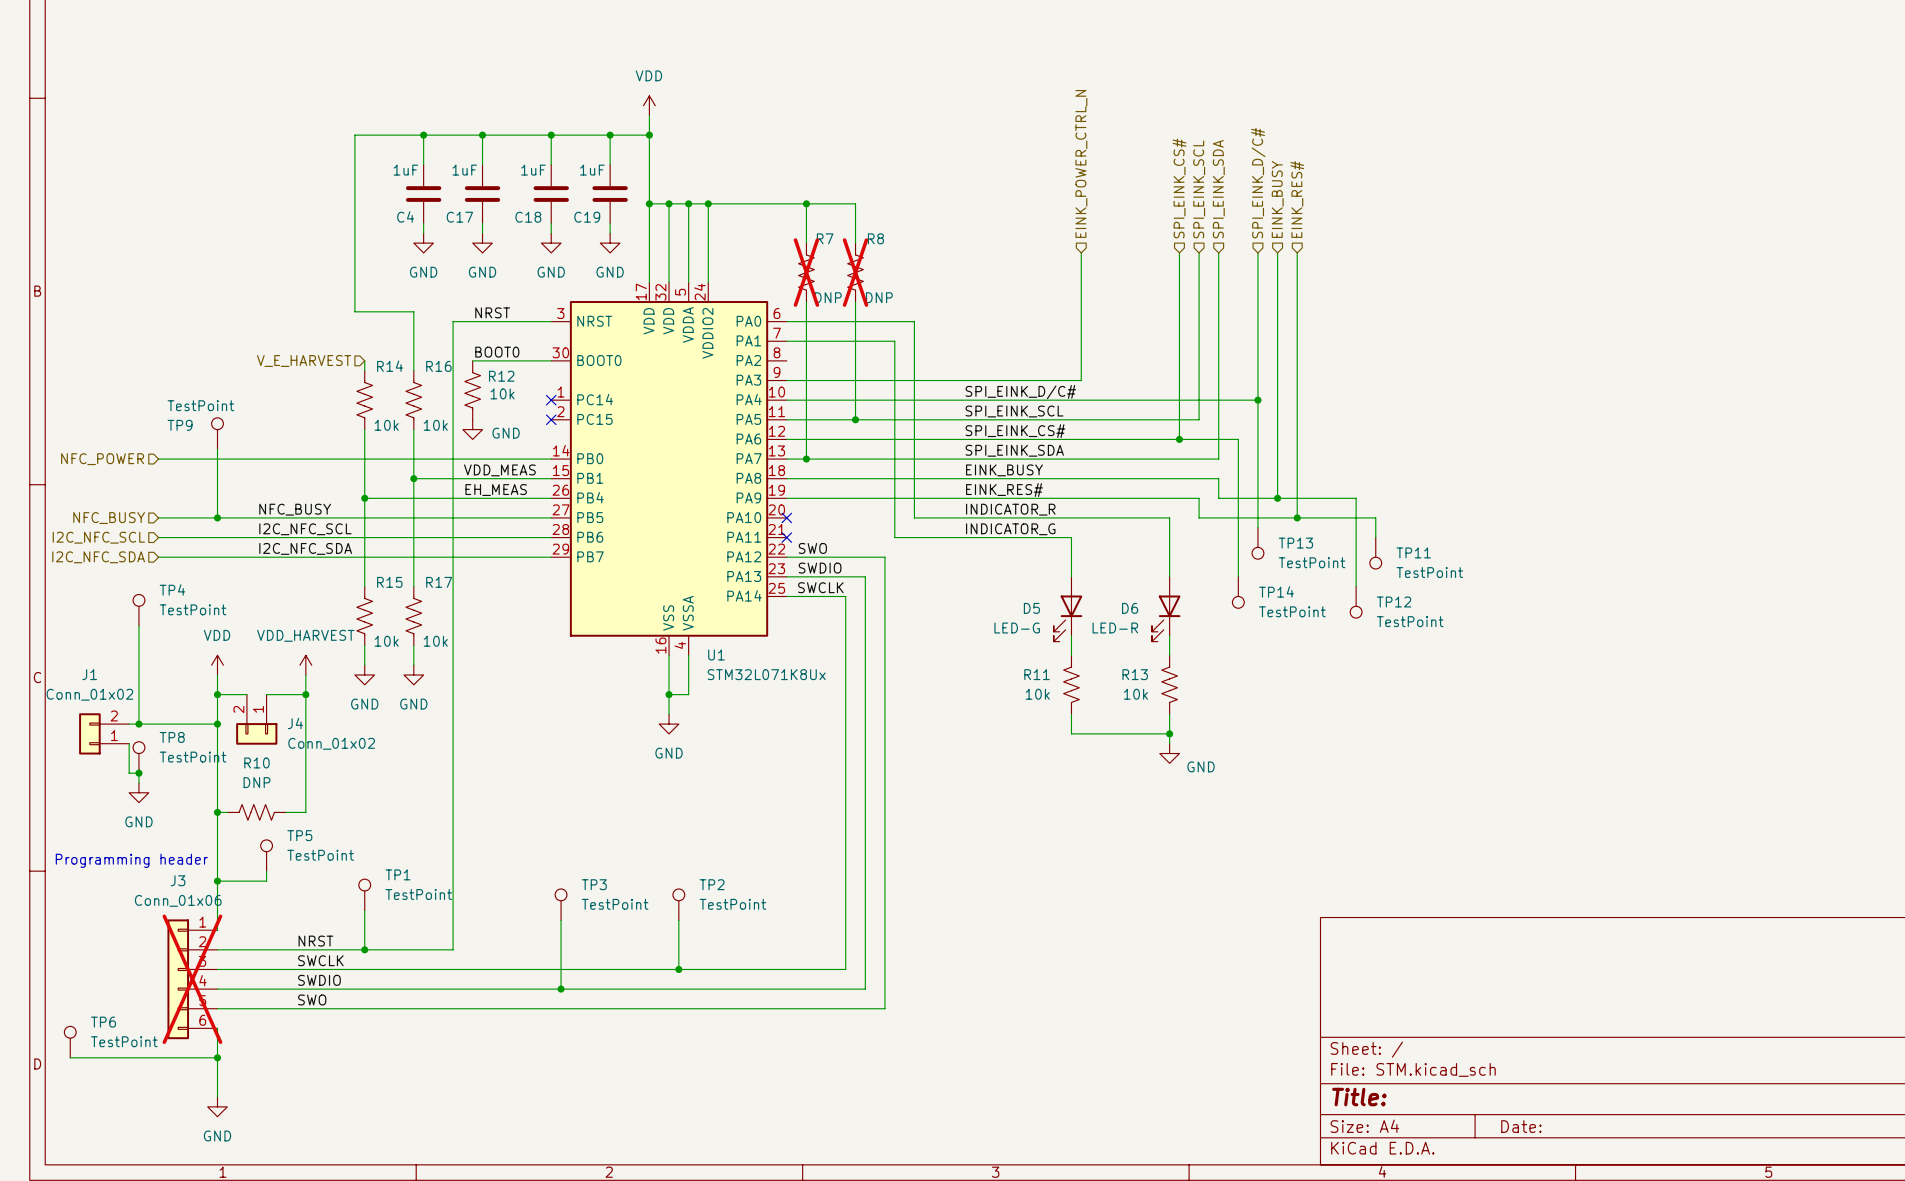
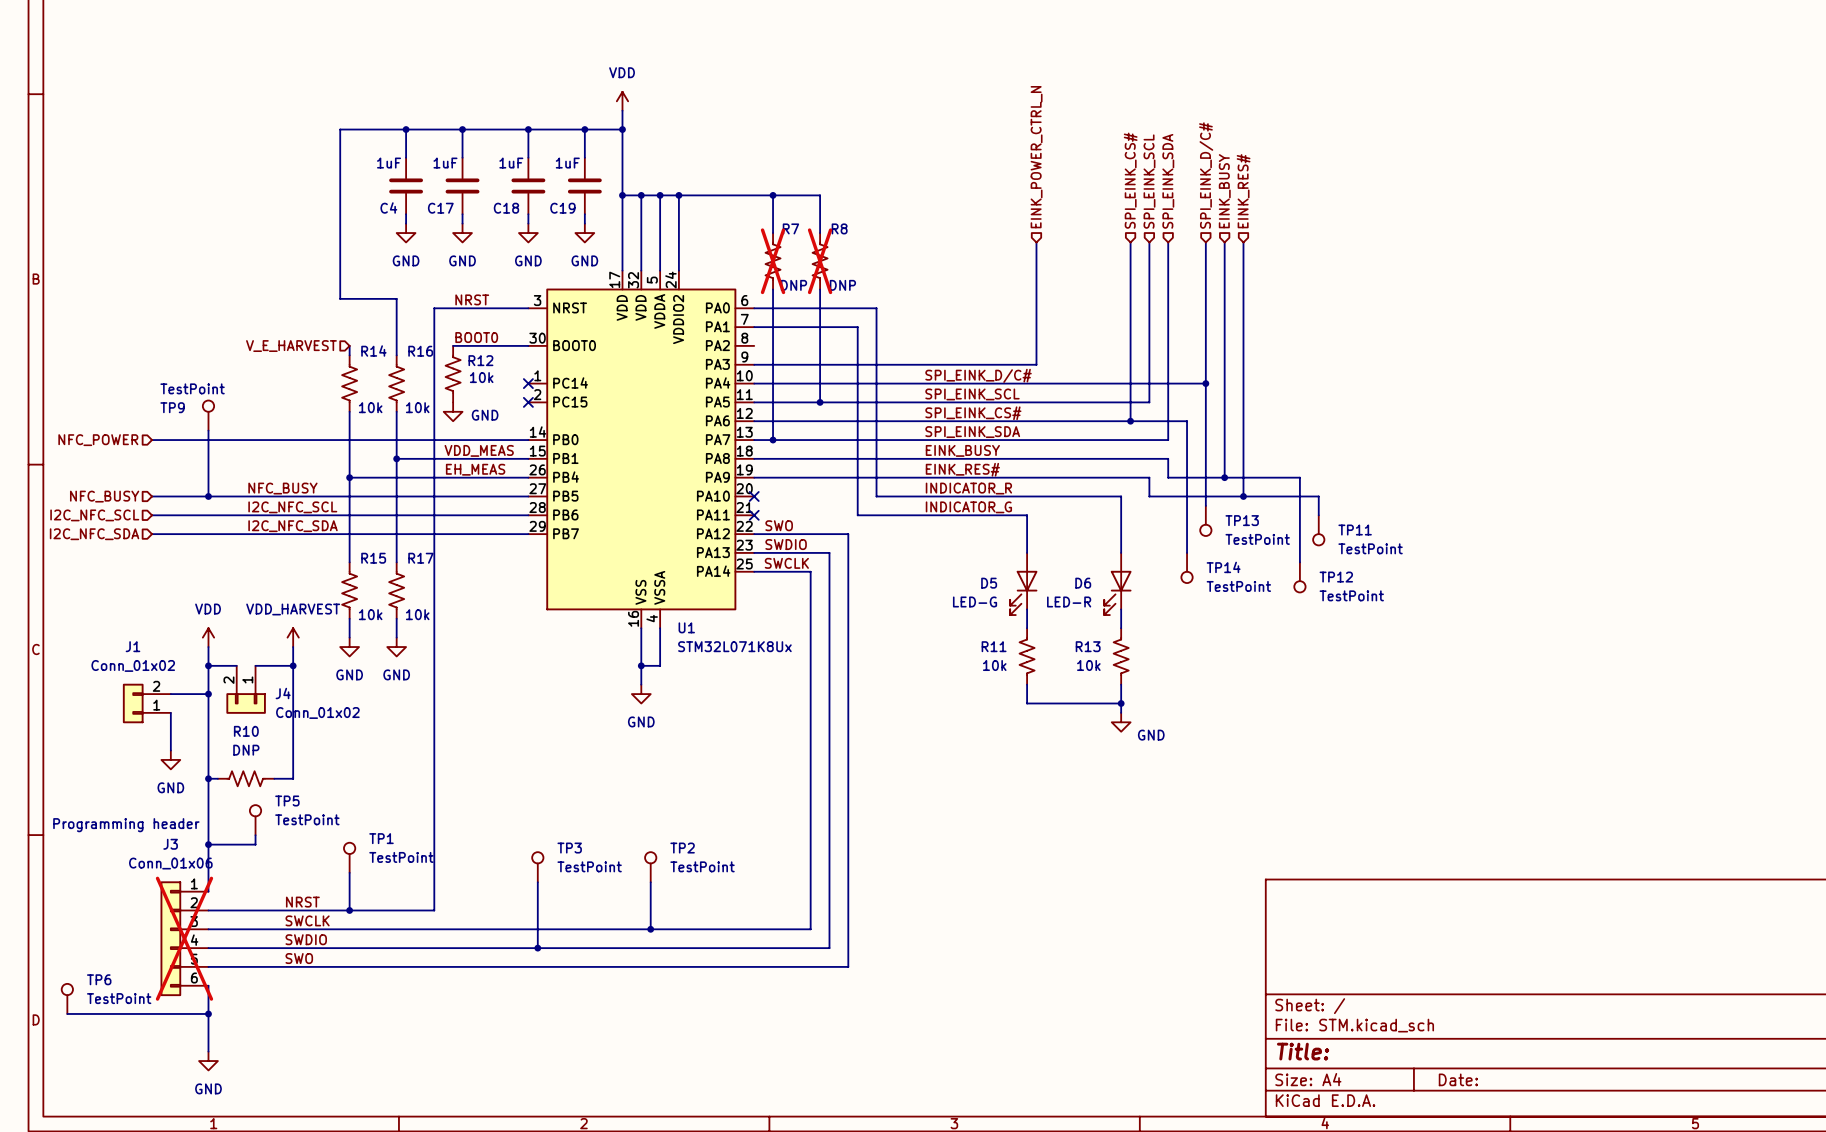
TP4: TestPoint (138, 610) -> none
wire: (138, 625) (138, 724) -> none
junction: (138, 724) -> none
J1 position: (104, 733) -> (146, 703)
wire: (129, 743) (129, 773) (138, 773) (138, 782) -> none
wire: none -> (170, 712) (170, 750)
TP8: TestPoint (138, 757) -> none
junction: (138, 773) -> none
power symbol position: GND (138, 792) -> GND (170, 759)

